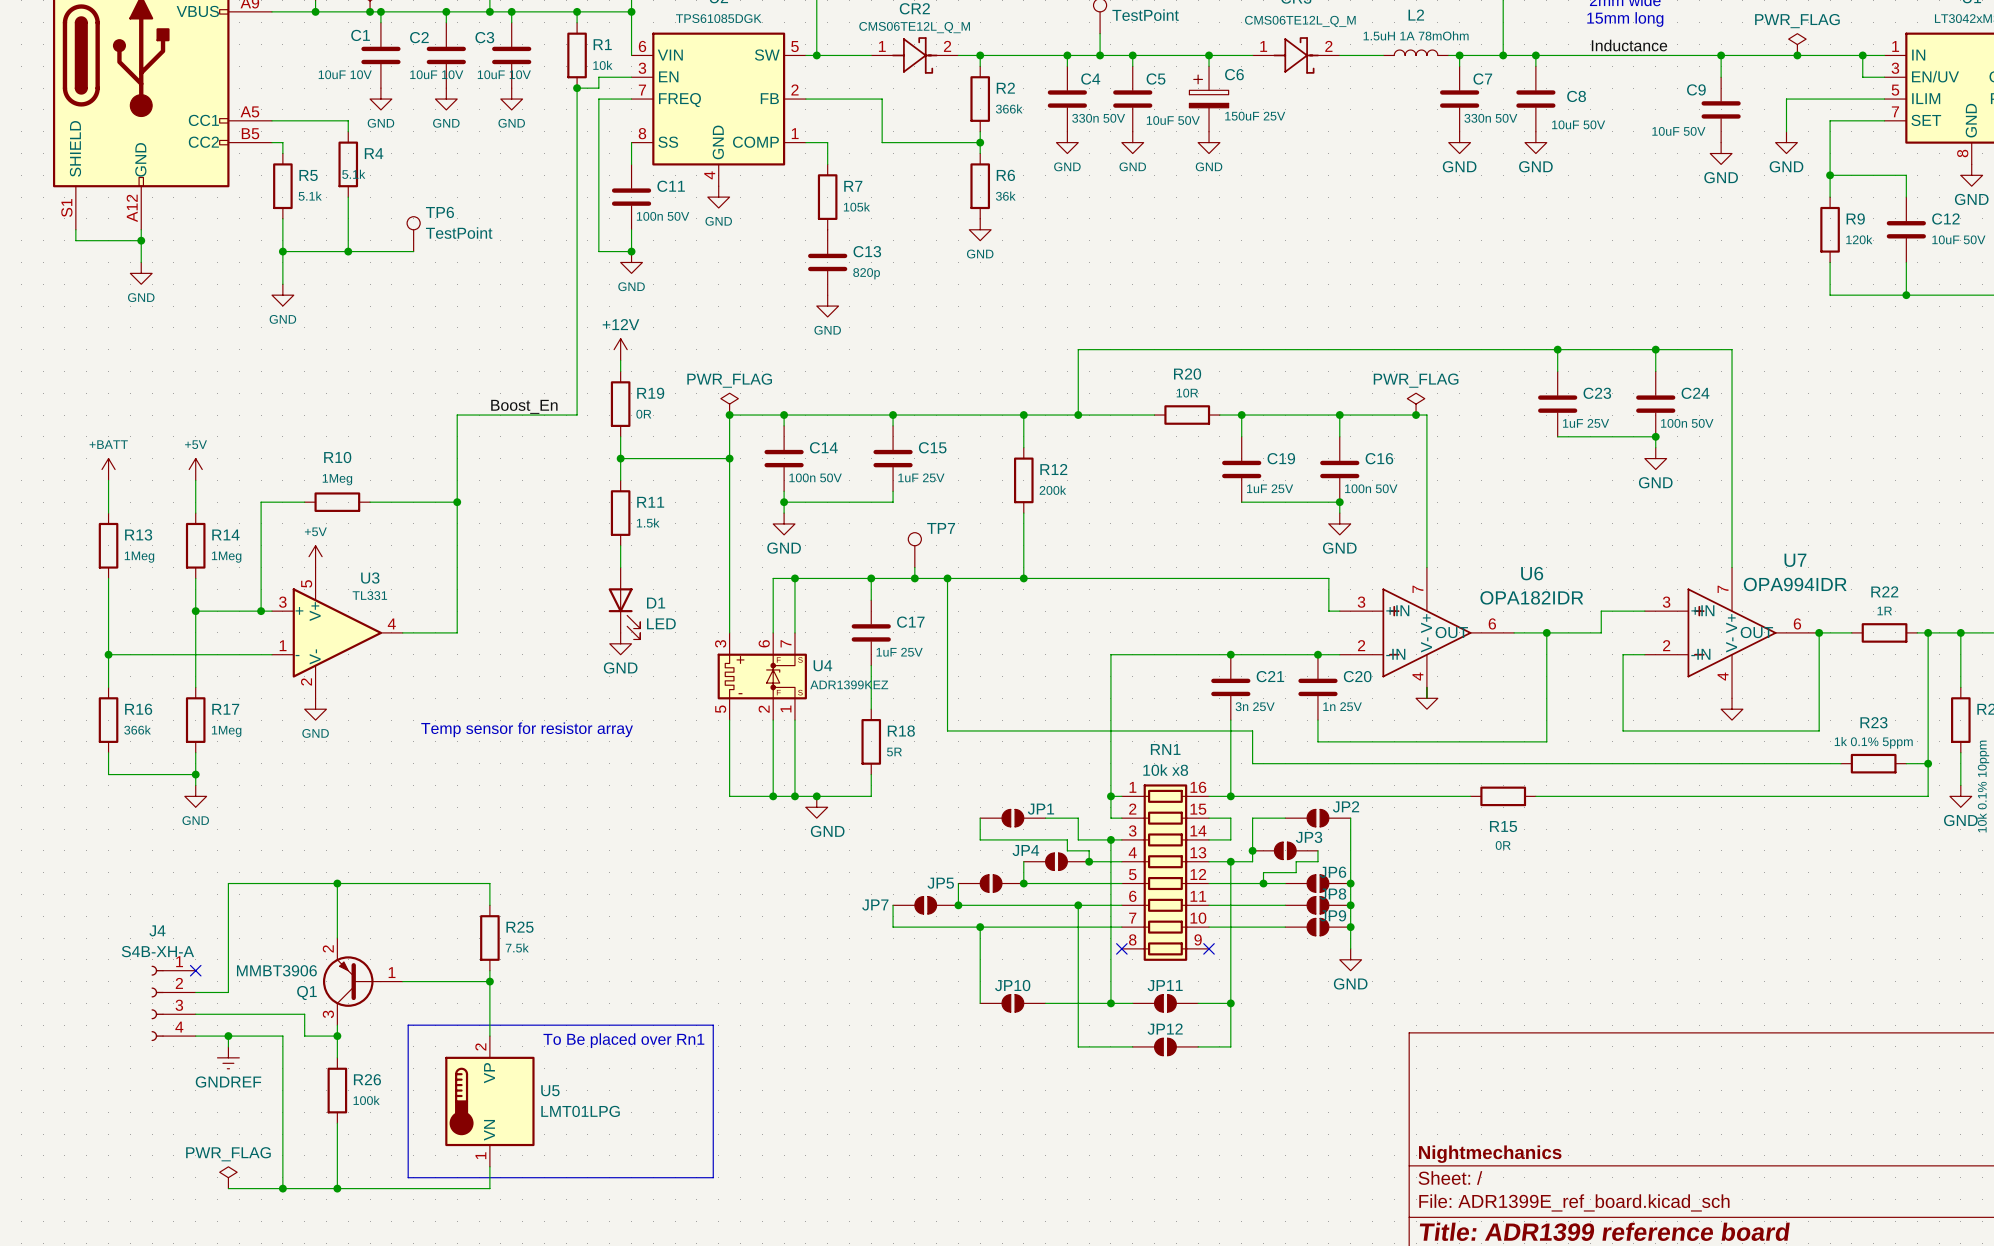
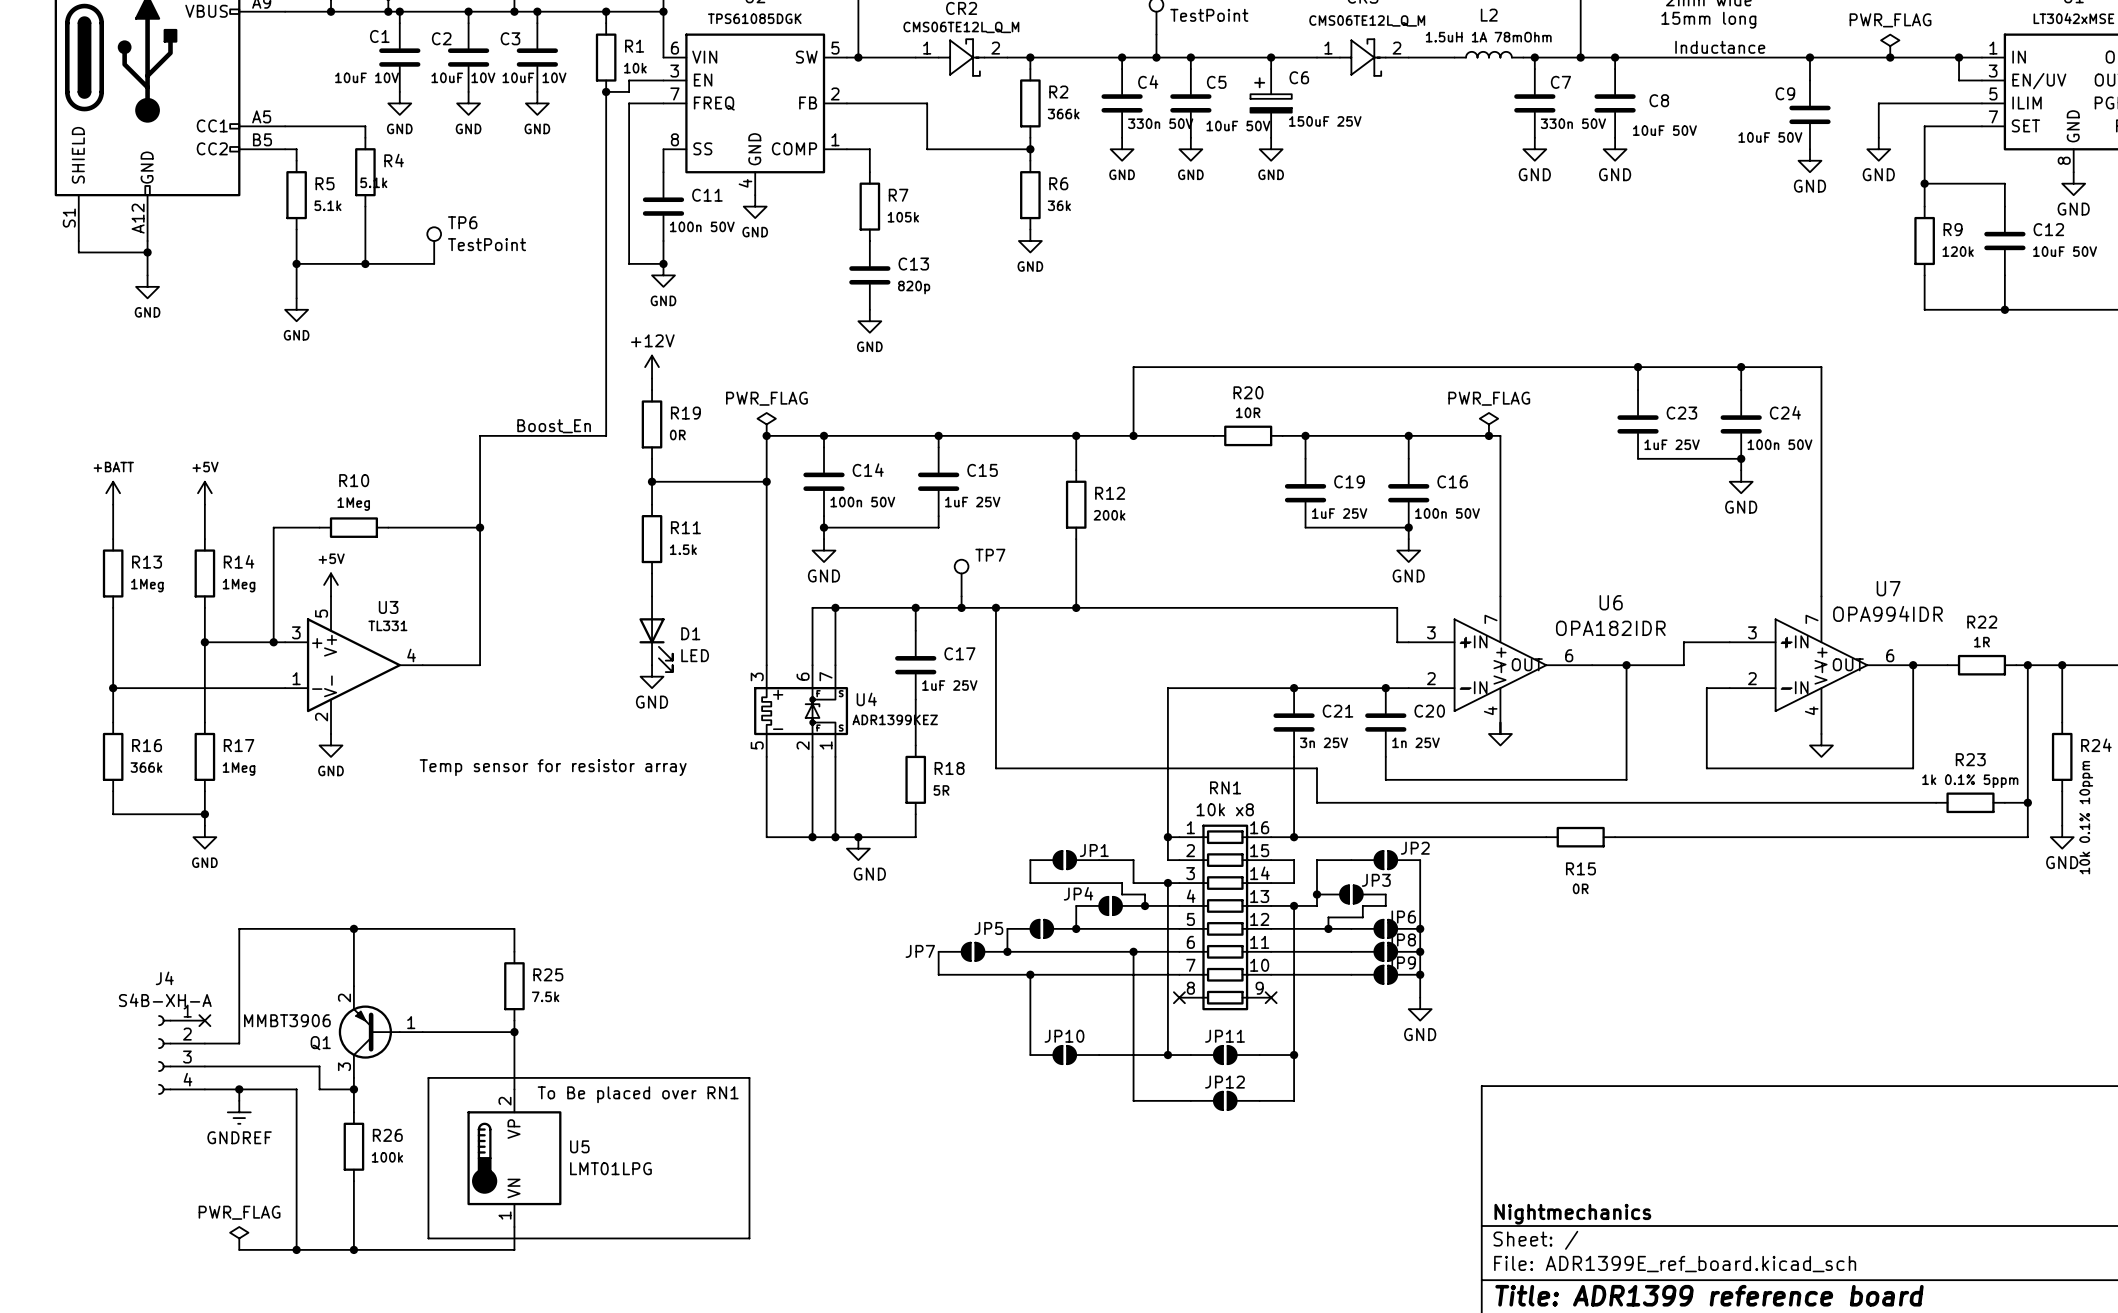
text: To Be placed over Rn1 (623, 1040) -> To Be placed over RN1 (638, 1094)

